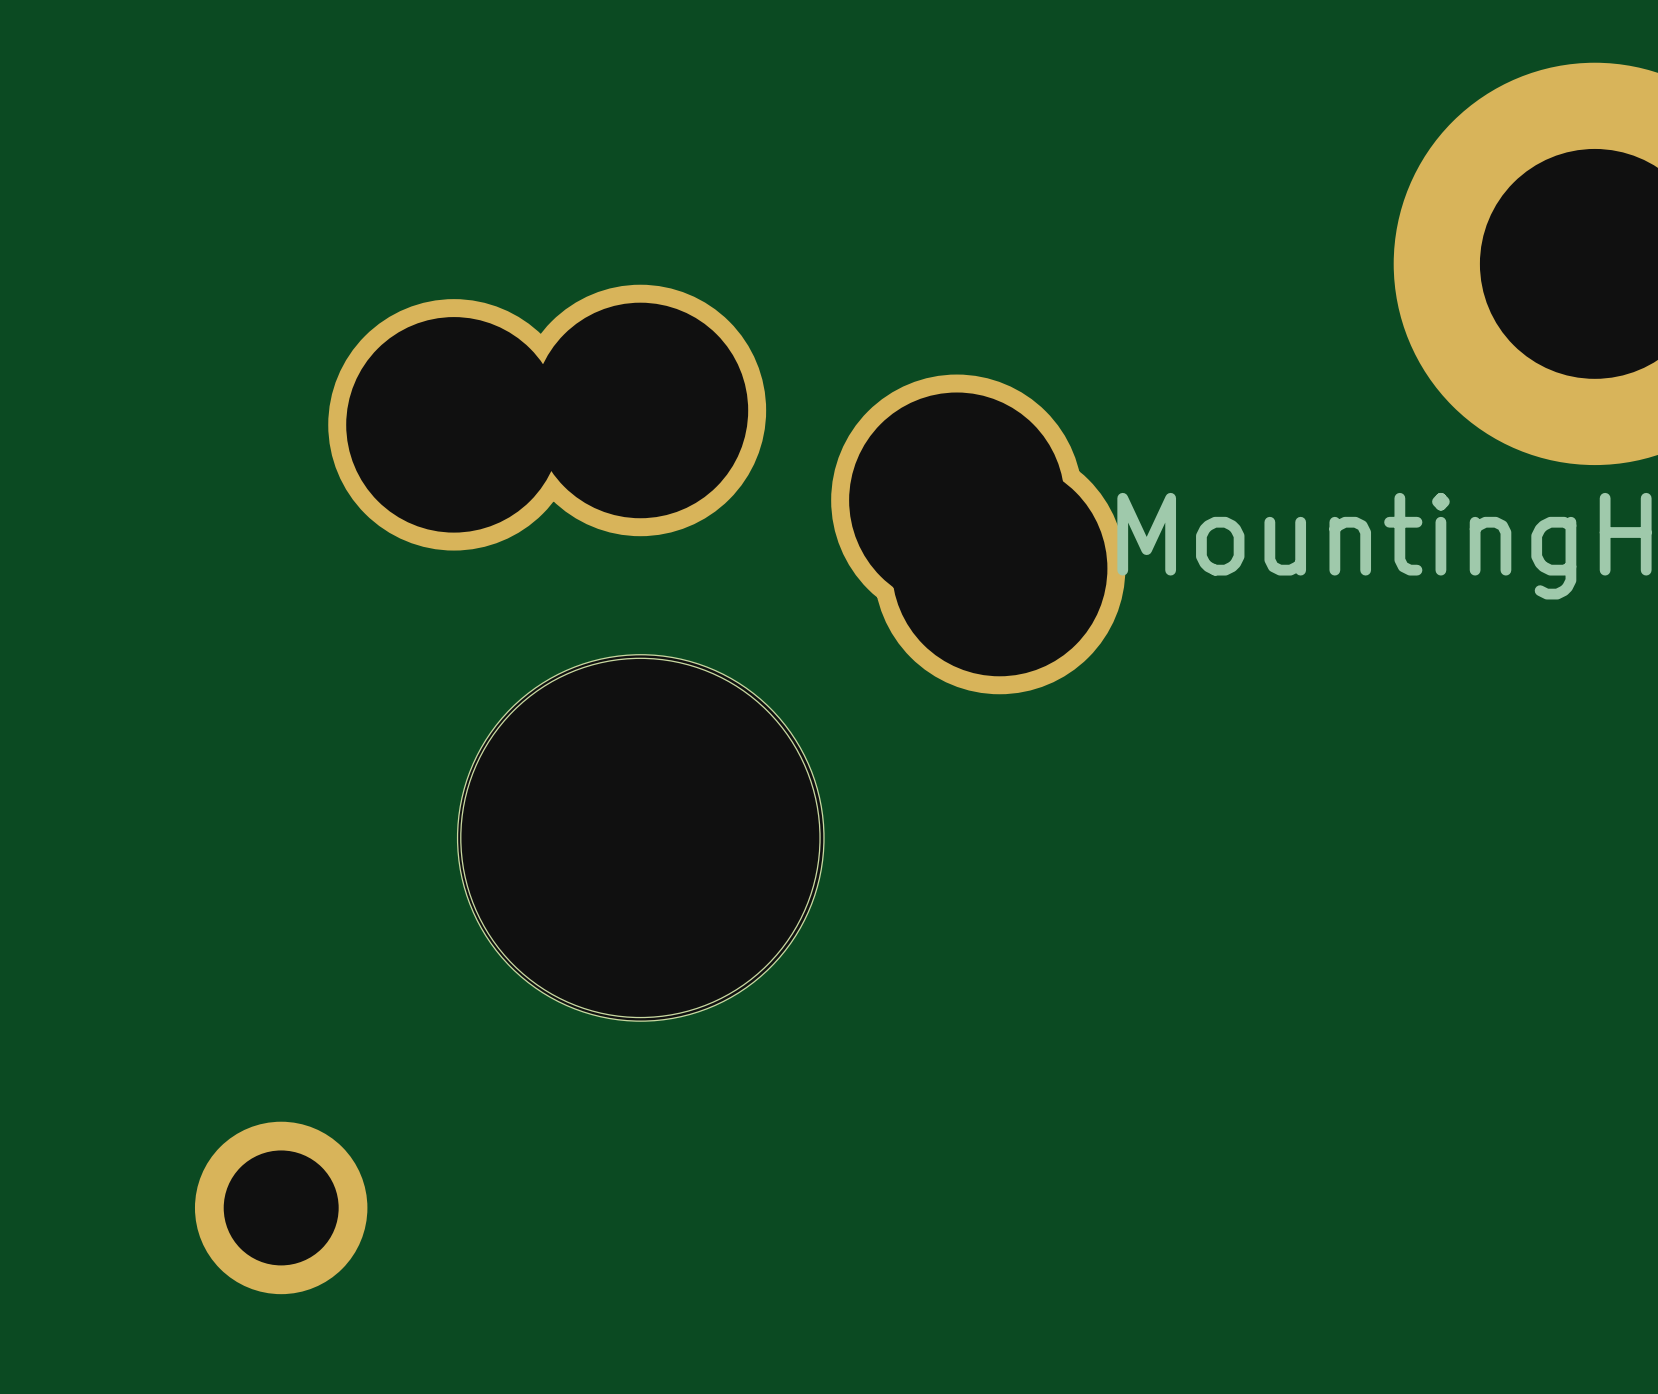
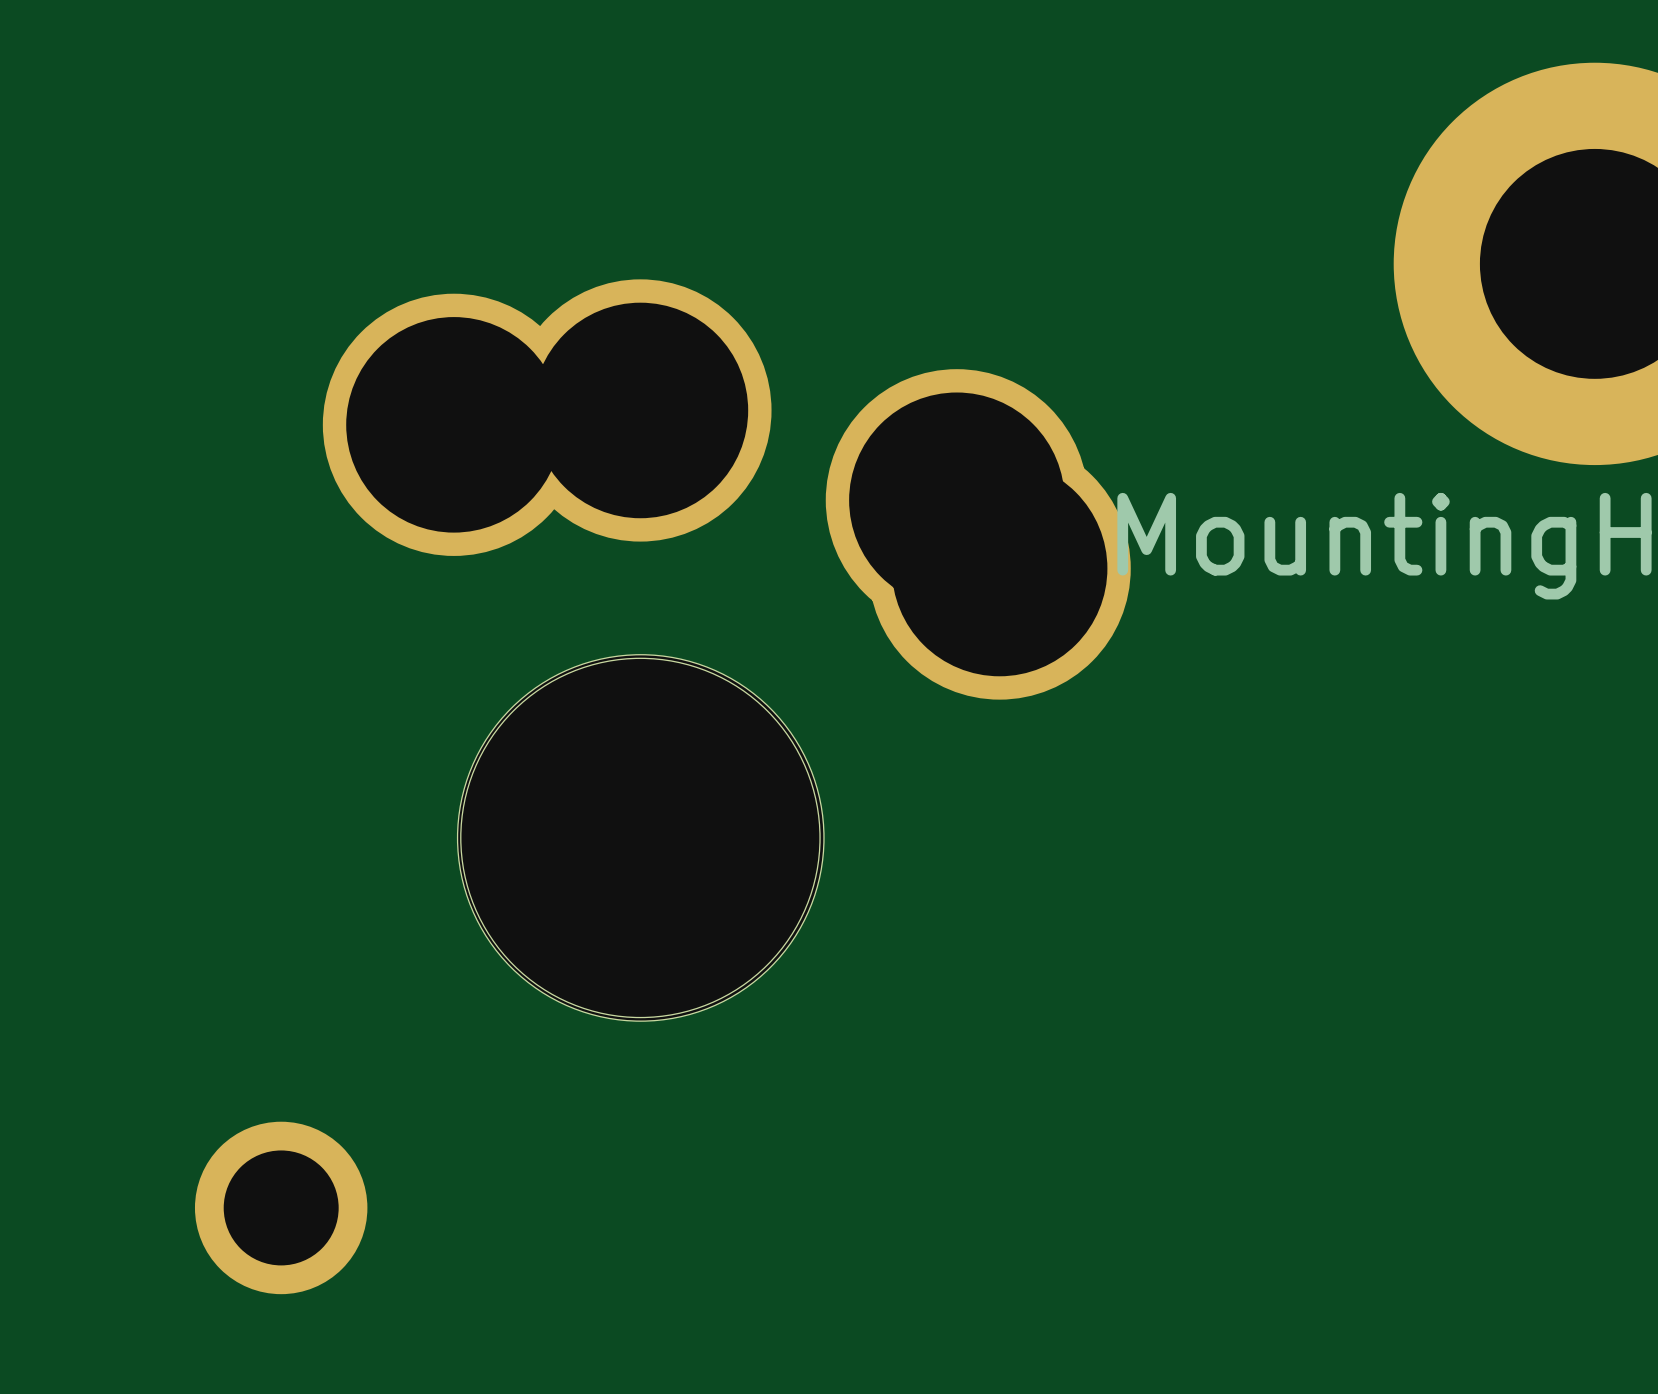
part footprint: [194, 284, 1126, 1295] -> [194, 279, 1131, 1295]

